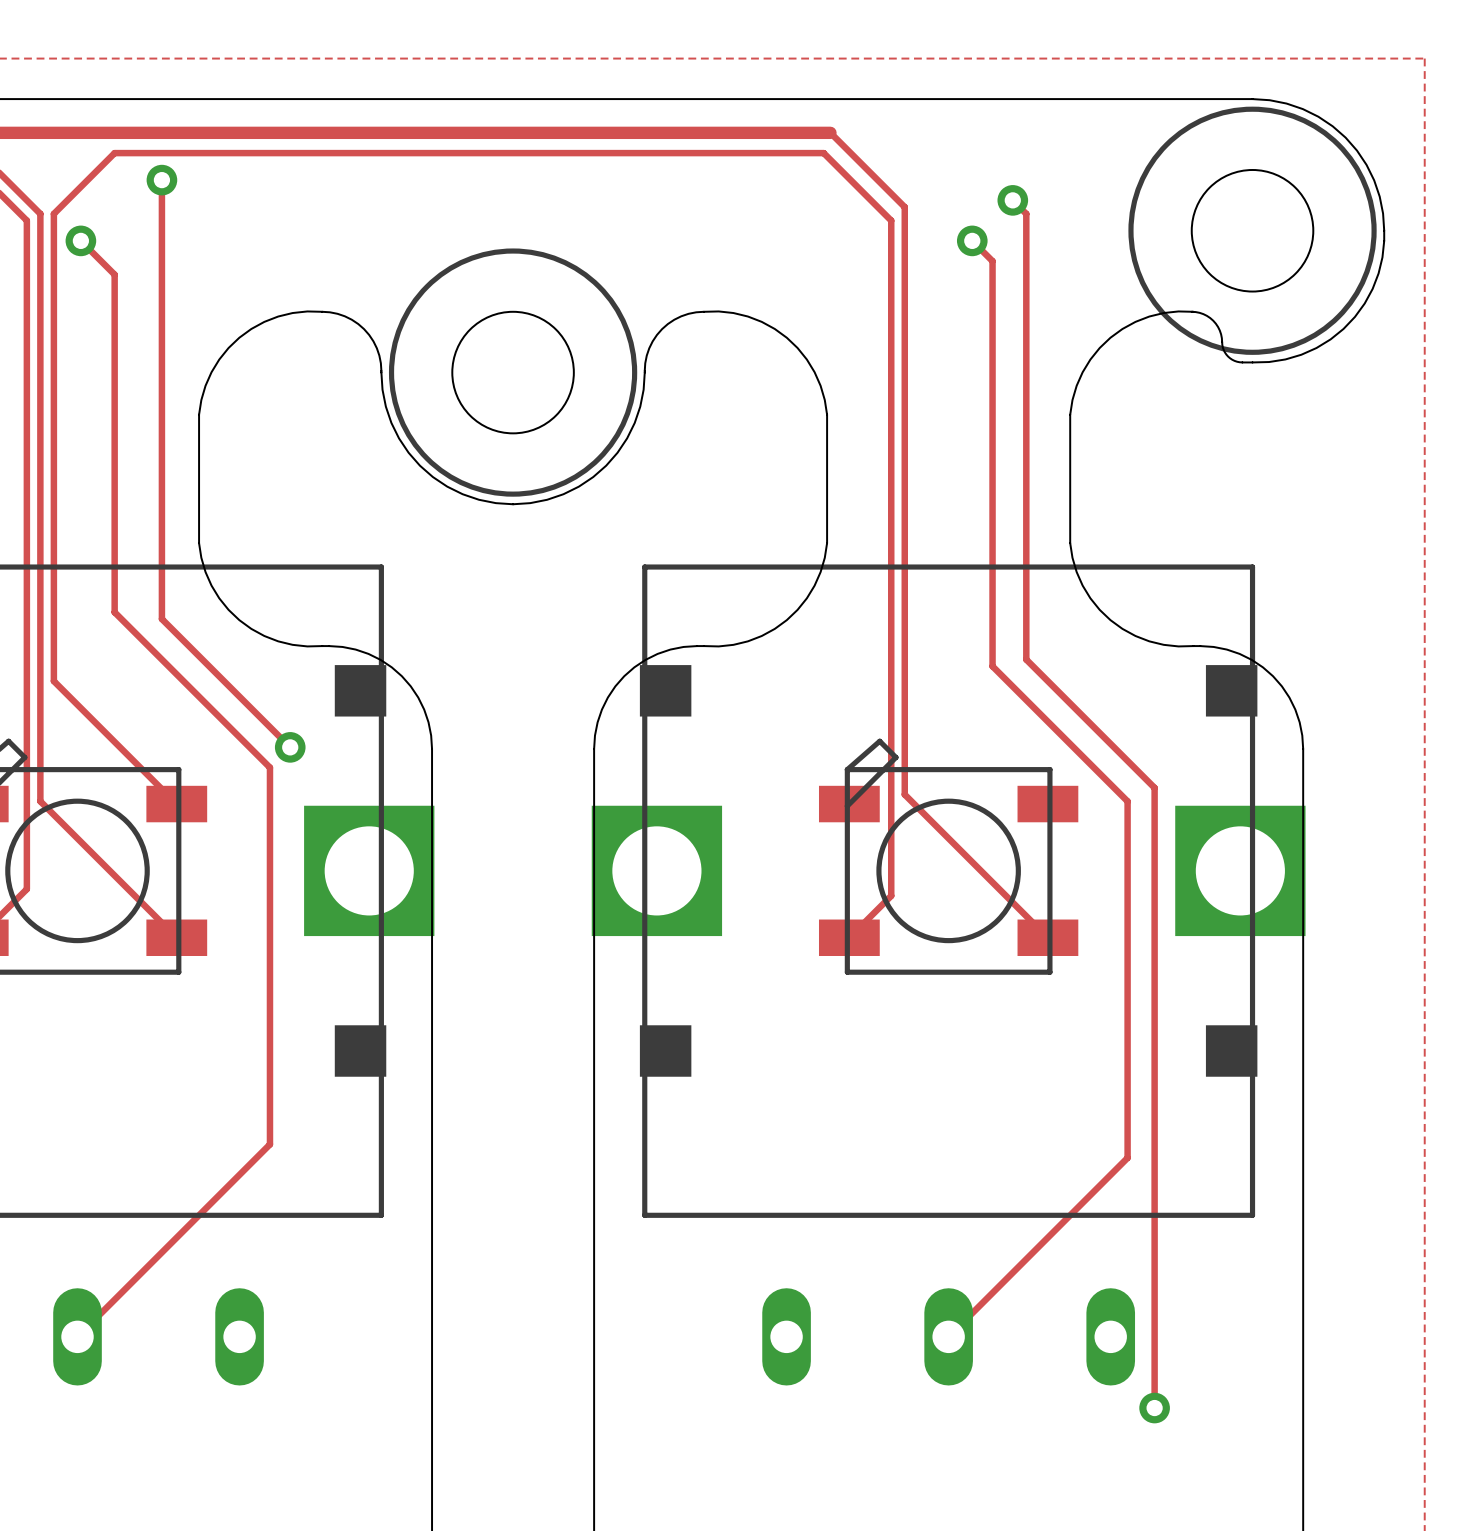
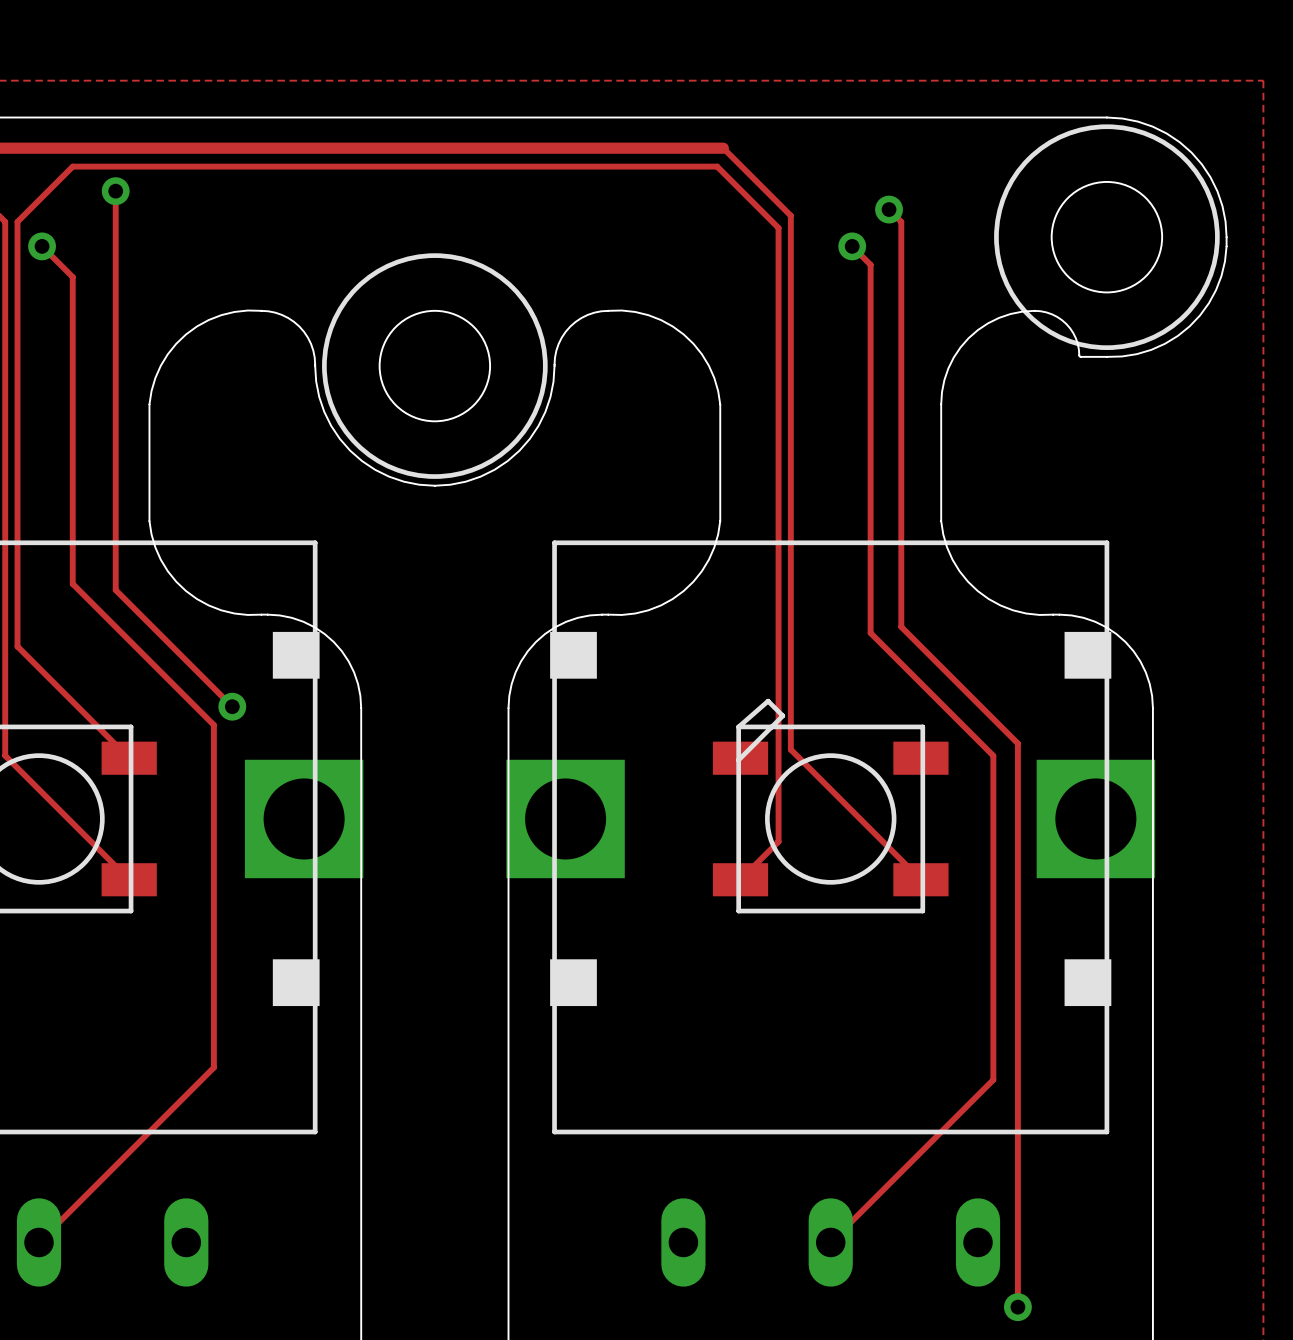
board edge: (1191, 311) (1203, 314) (1213, 320) (1219, 330) (1222, 347) (1226, 354) (1232, 359) (1242, 362) -> none
board edge: (1193, 311) (1178, 311) (1149, 316) (1135, 321) (1110, 337) (1099, 347) (1082, 372) (1072, 400) (1070, 414) -> (1097, 356) (1079, 356) (1073, 333) (1061, 320) (1051, 314) (1034, 310) (1010, 314) (998, 317) (977, 330) (960, 347) (948, 368) (944, 380) (941, 404)

